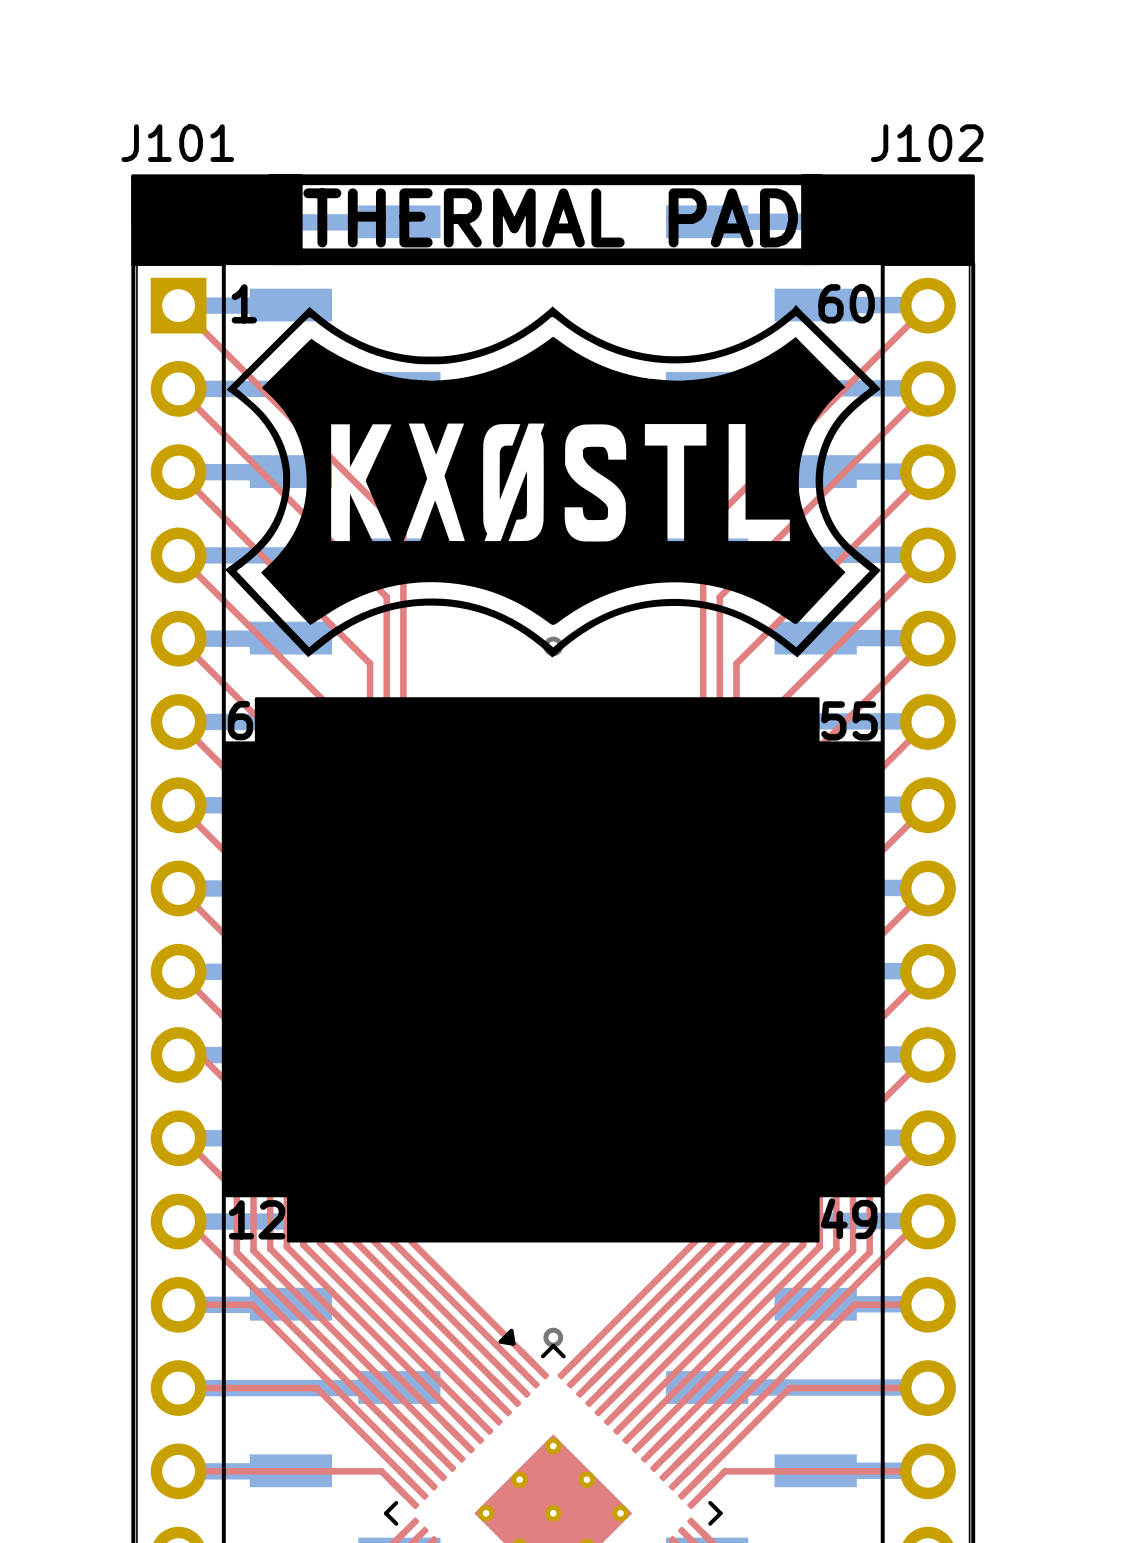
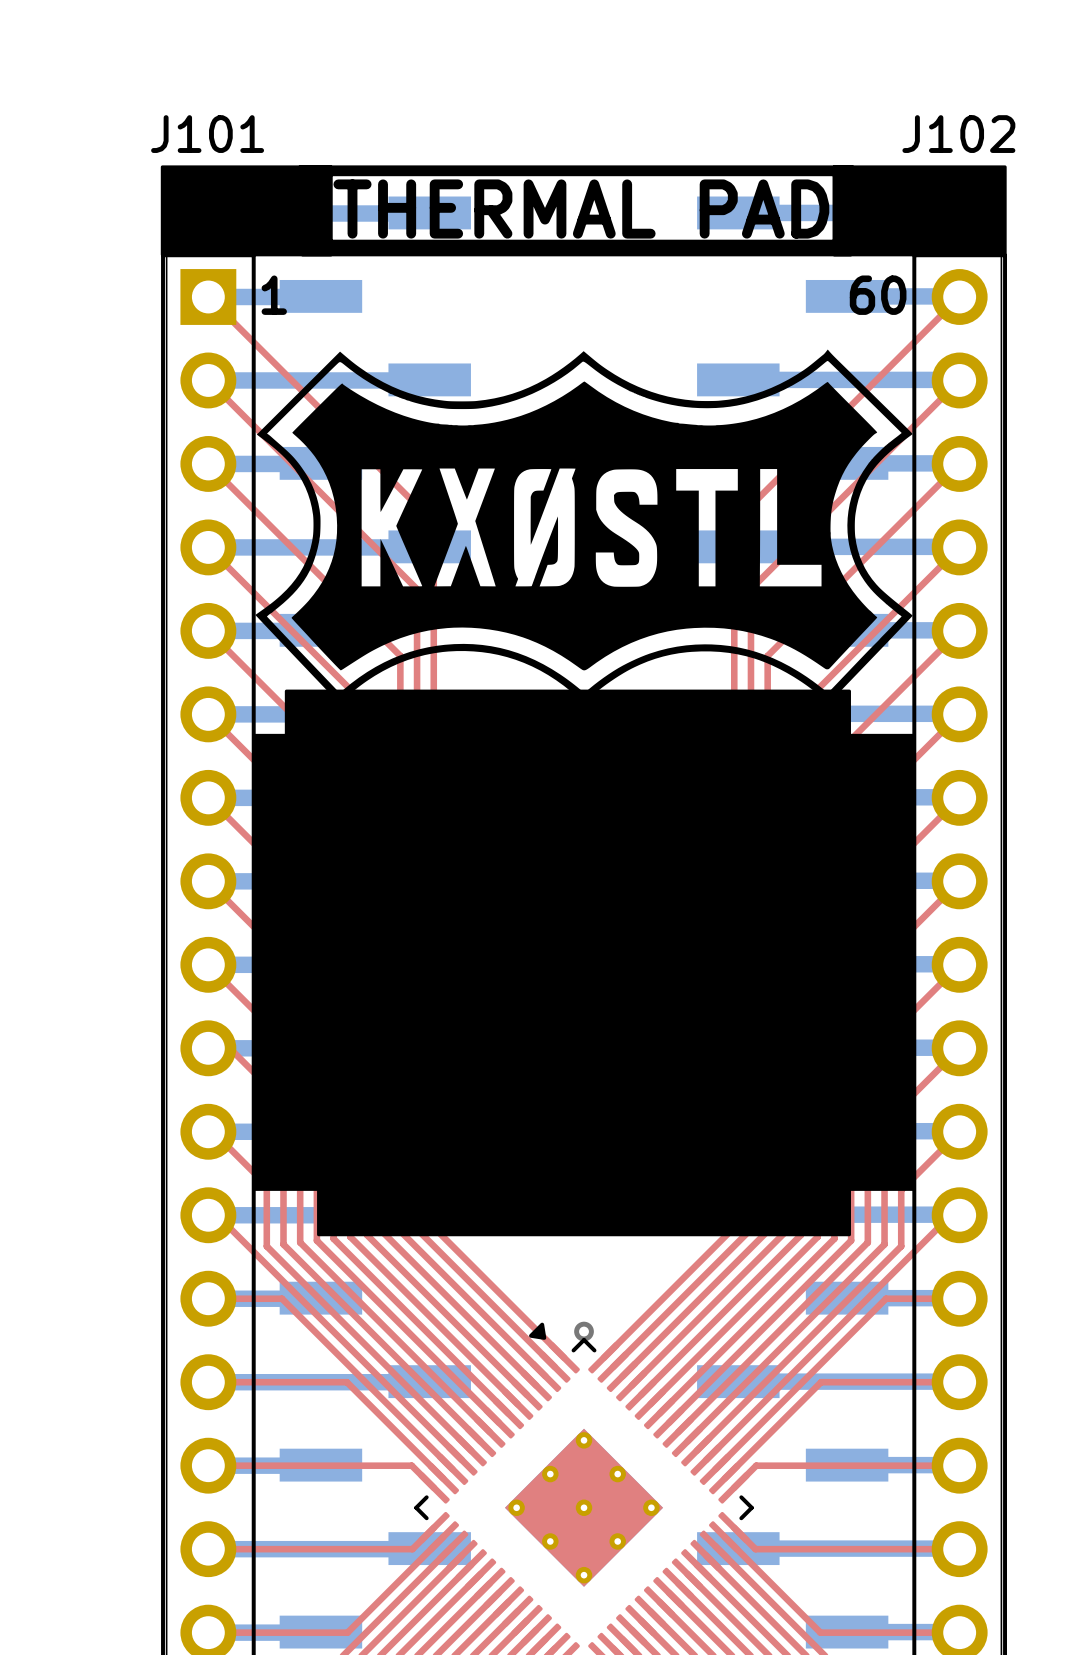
drawing position: (552, 481) -> (583, 526)
text: 6 (240, 720) -> none
text: 55 (849, 720) -> none
text: 49 (849, 1218) -> none
text: 12 (257, 1219) -> none

